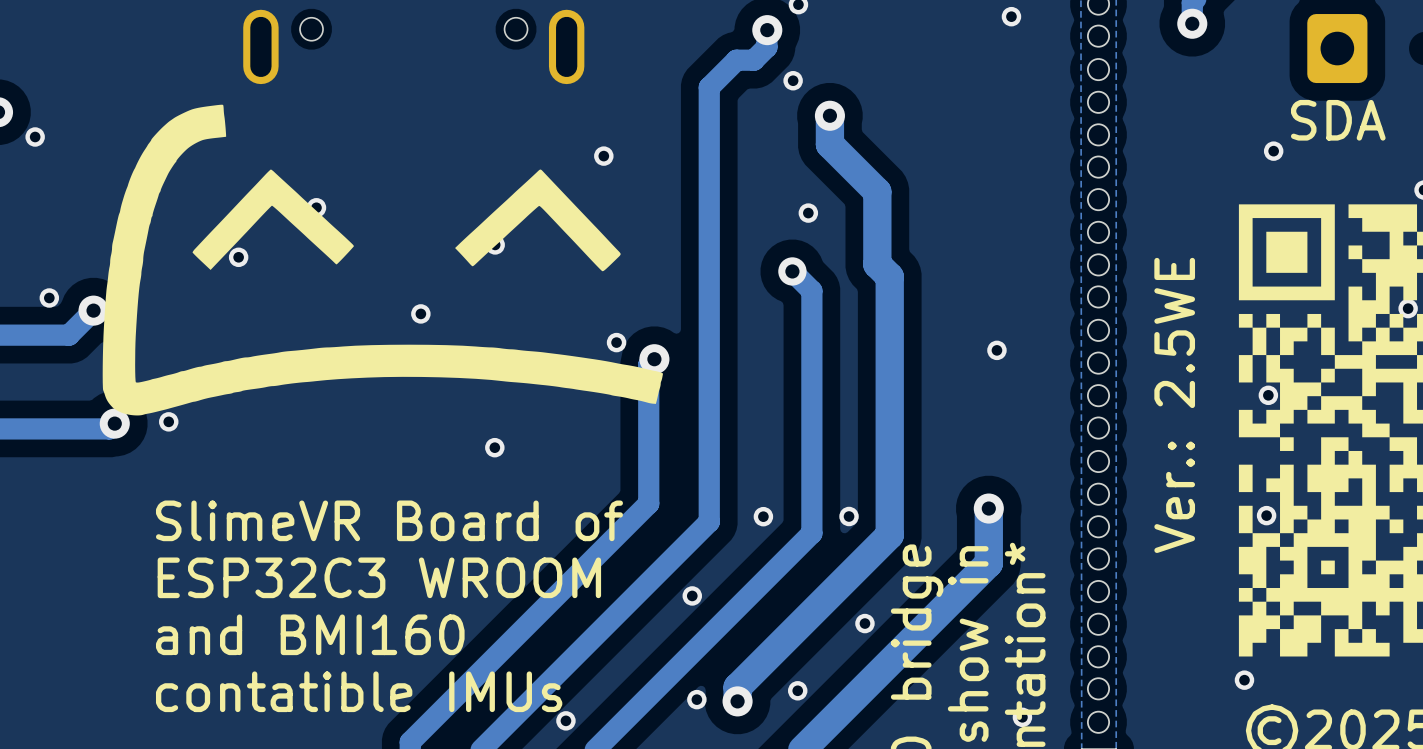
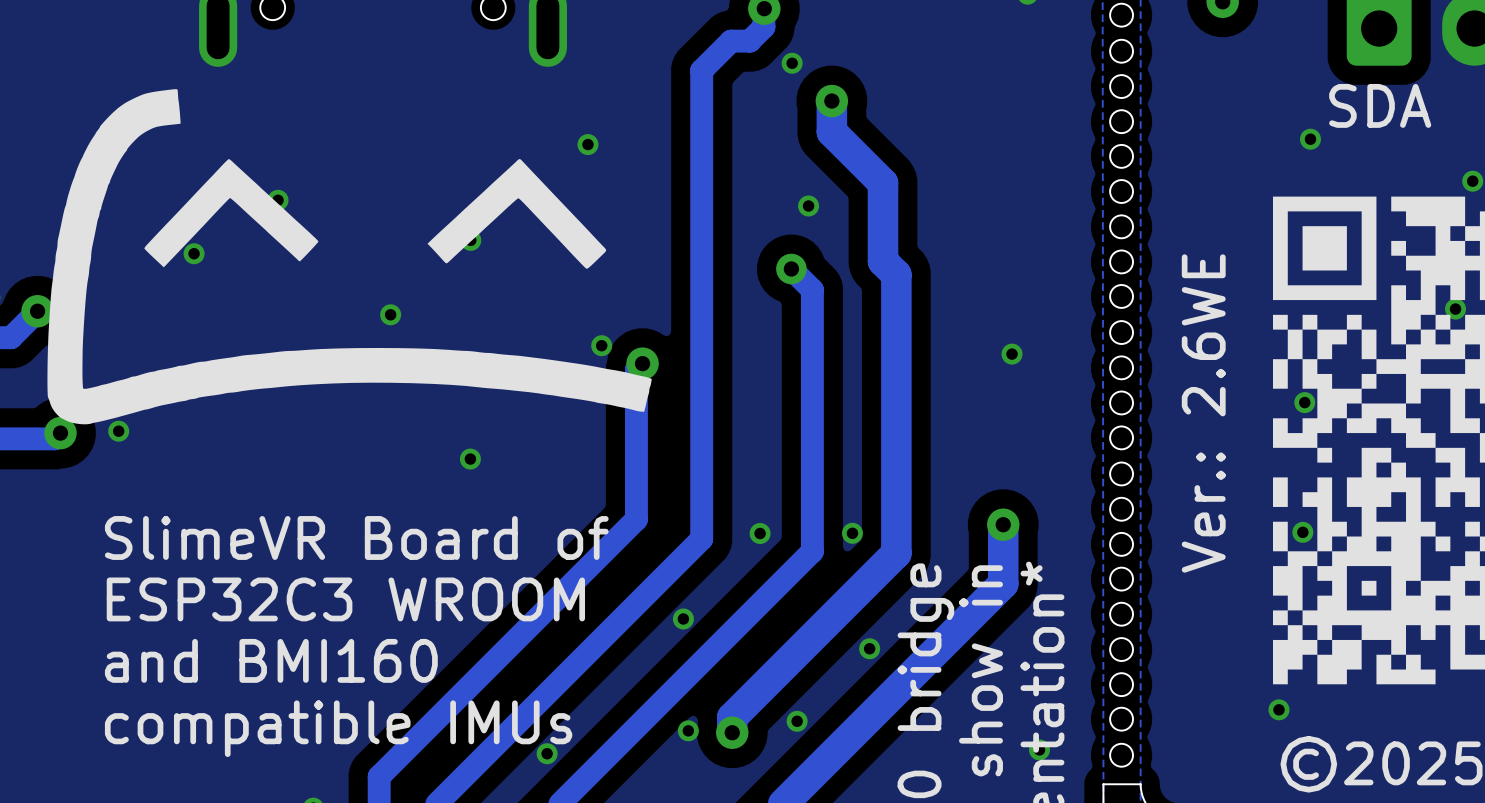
text: Ver.: 2.5WE (1174, 405) -> Ver.: 2.6WE (1203, 413)
text: contatible IMUs (359, 691) -> compatible IMUs (338, 728)

